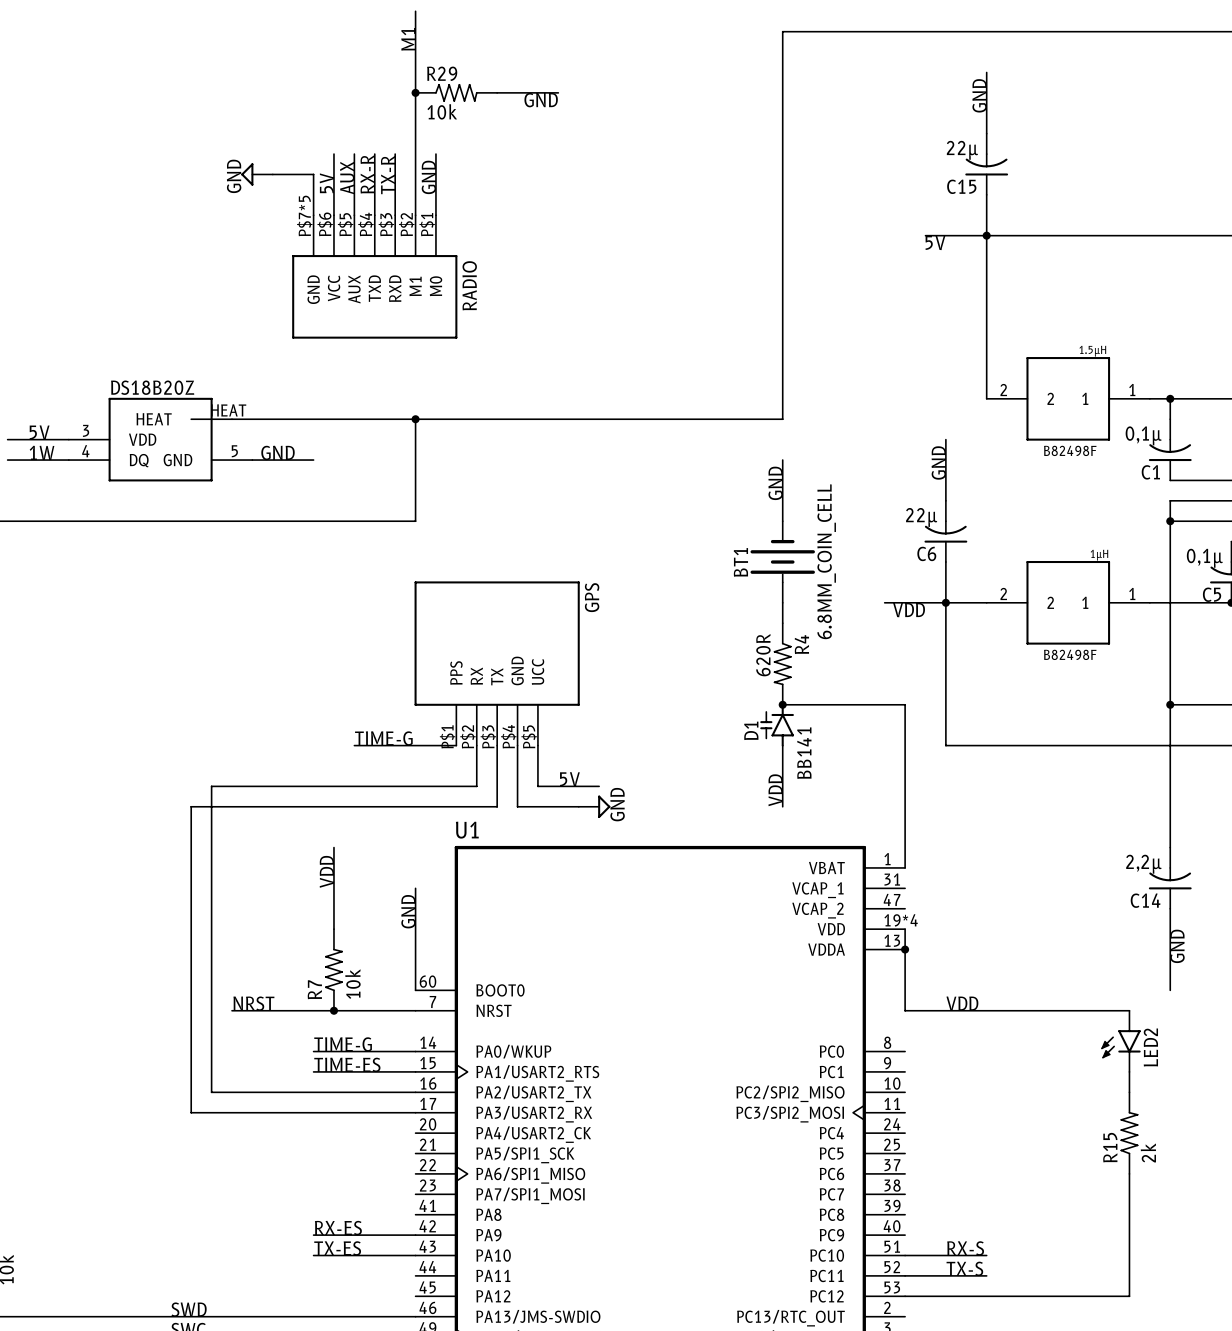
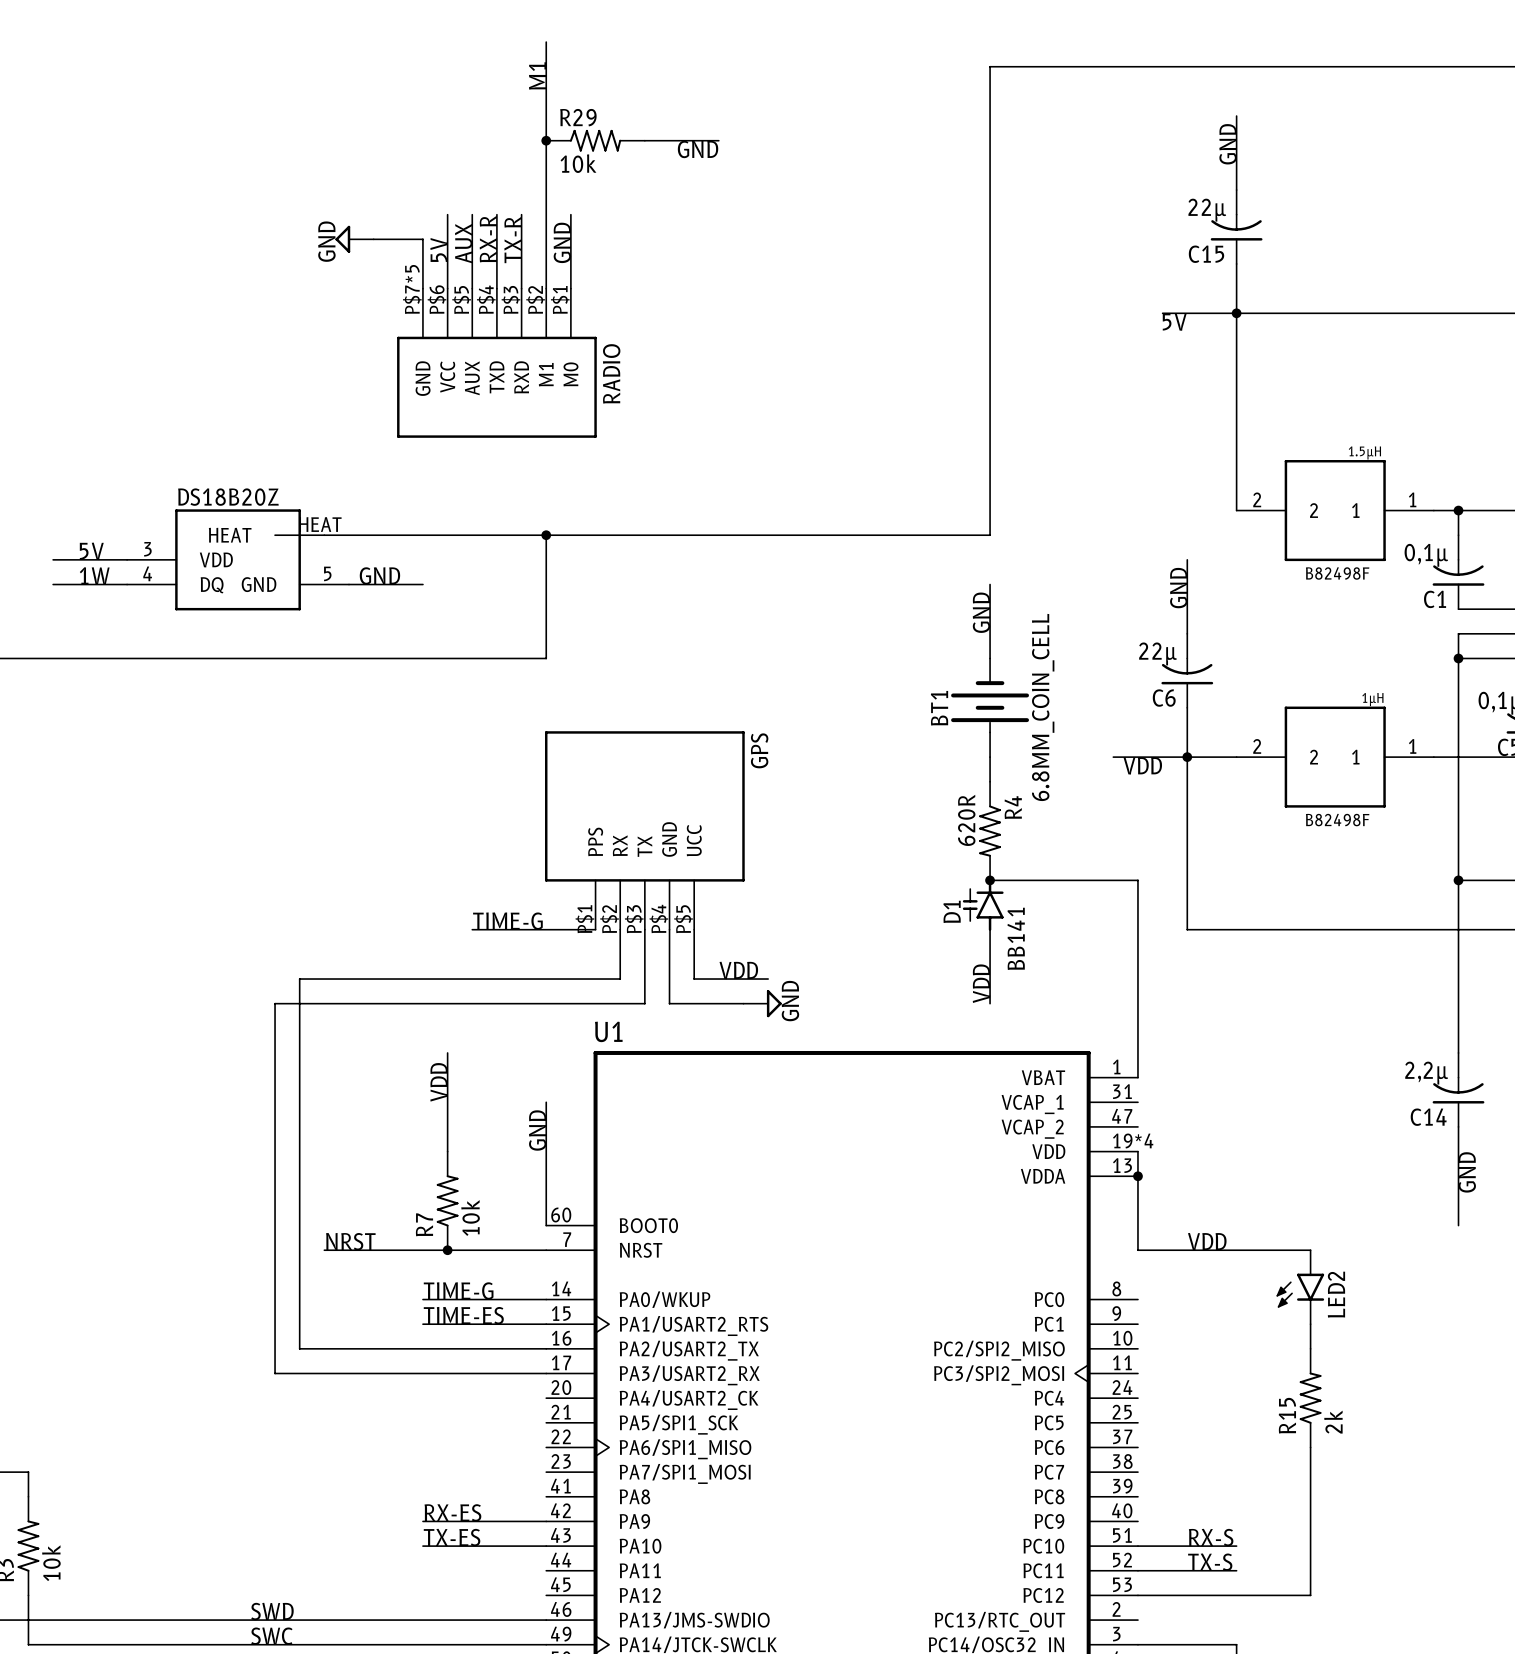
label: 5V (569, 779) -> VDD (738, 970)
wire: (1047, 1010) (1129, 1010) -> none
LED2 position: (1121, 1041) -> (1300, 1287)
wire: (1129, 1071) (1129, 1092) -> (1310, 1324) (1310, 1348)
R15 position: (1129, 1133) -> (1310, 1398)
wire: (1129, 1173) (1129, 1296) (1047, 1296) -> (1310, 1447) (1310, 1595)

